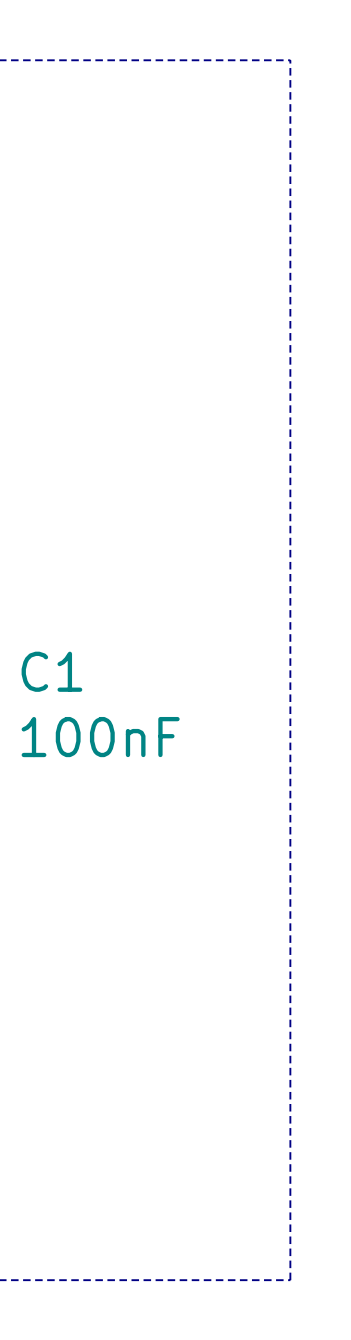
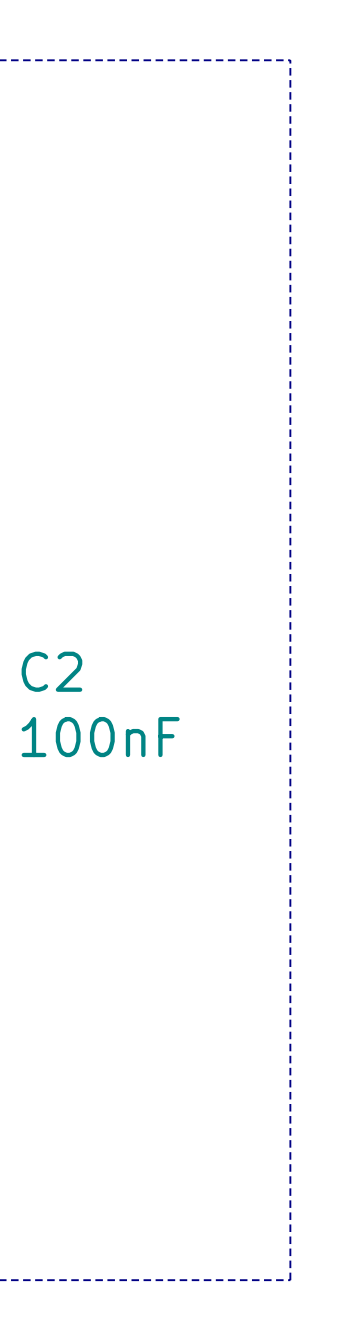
C1 name: C1 (51, 671) -> C2 (51, 671)

